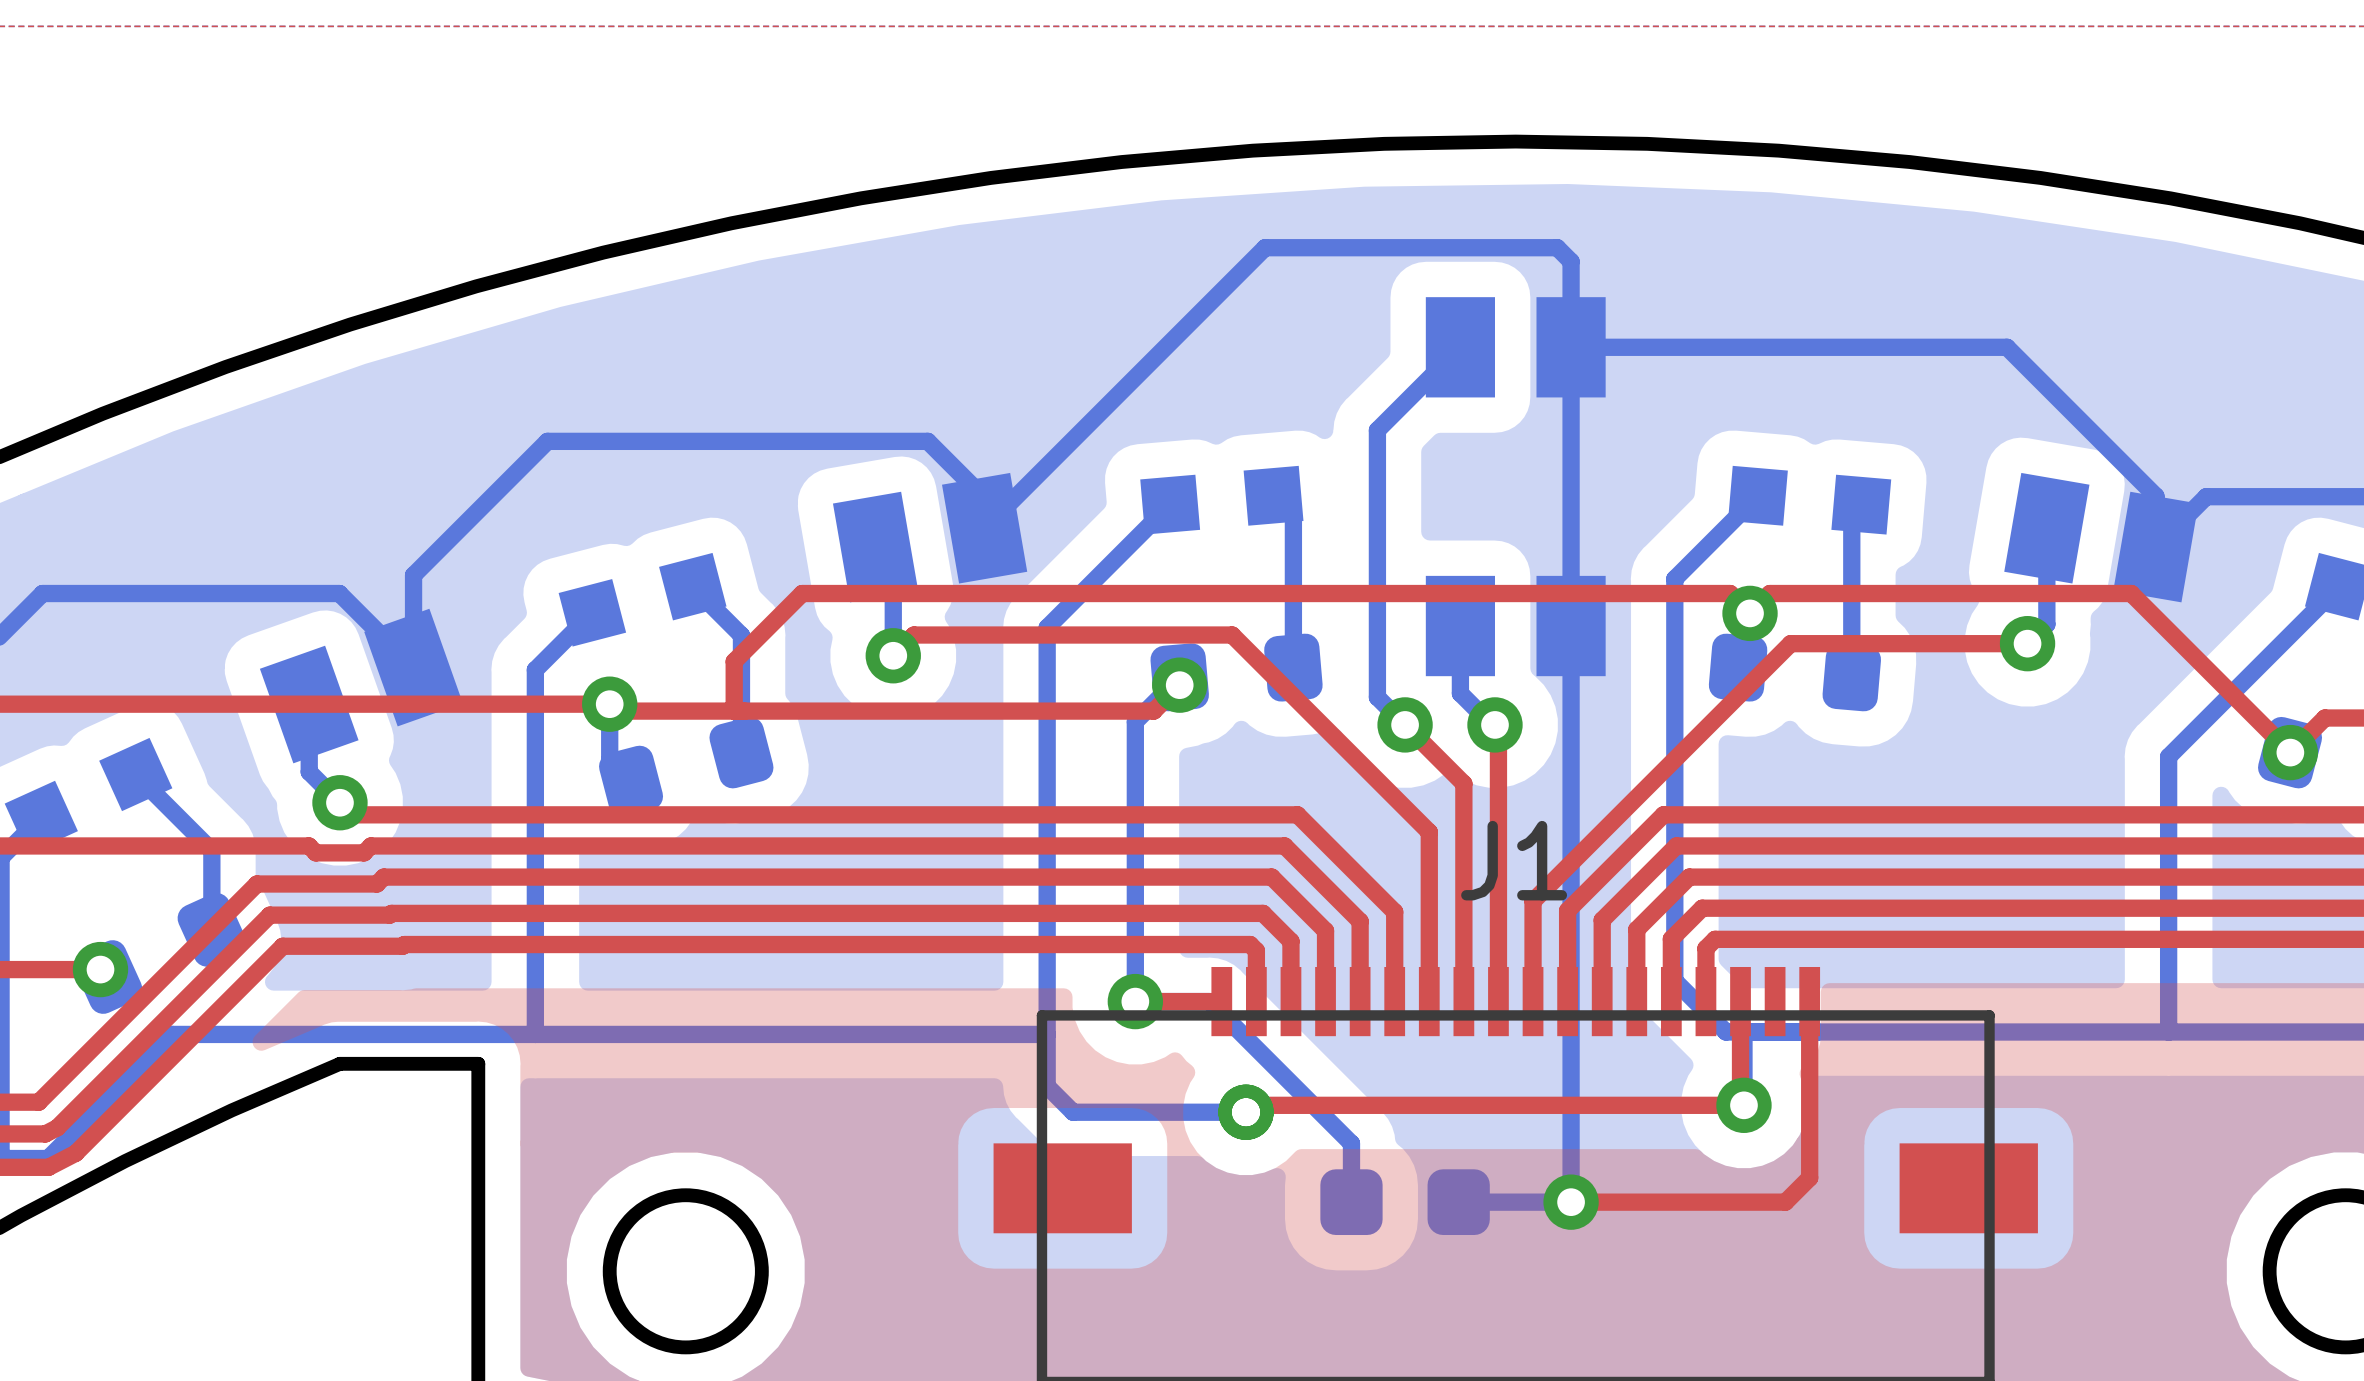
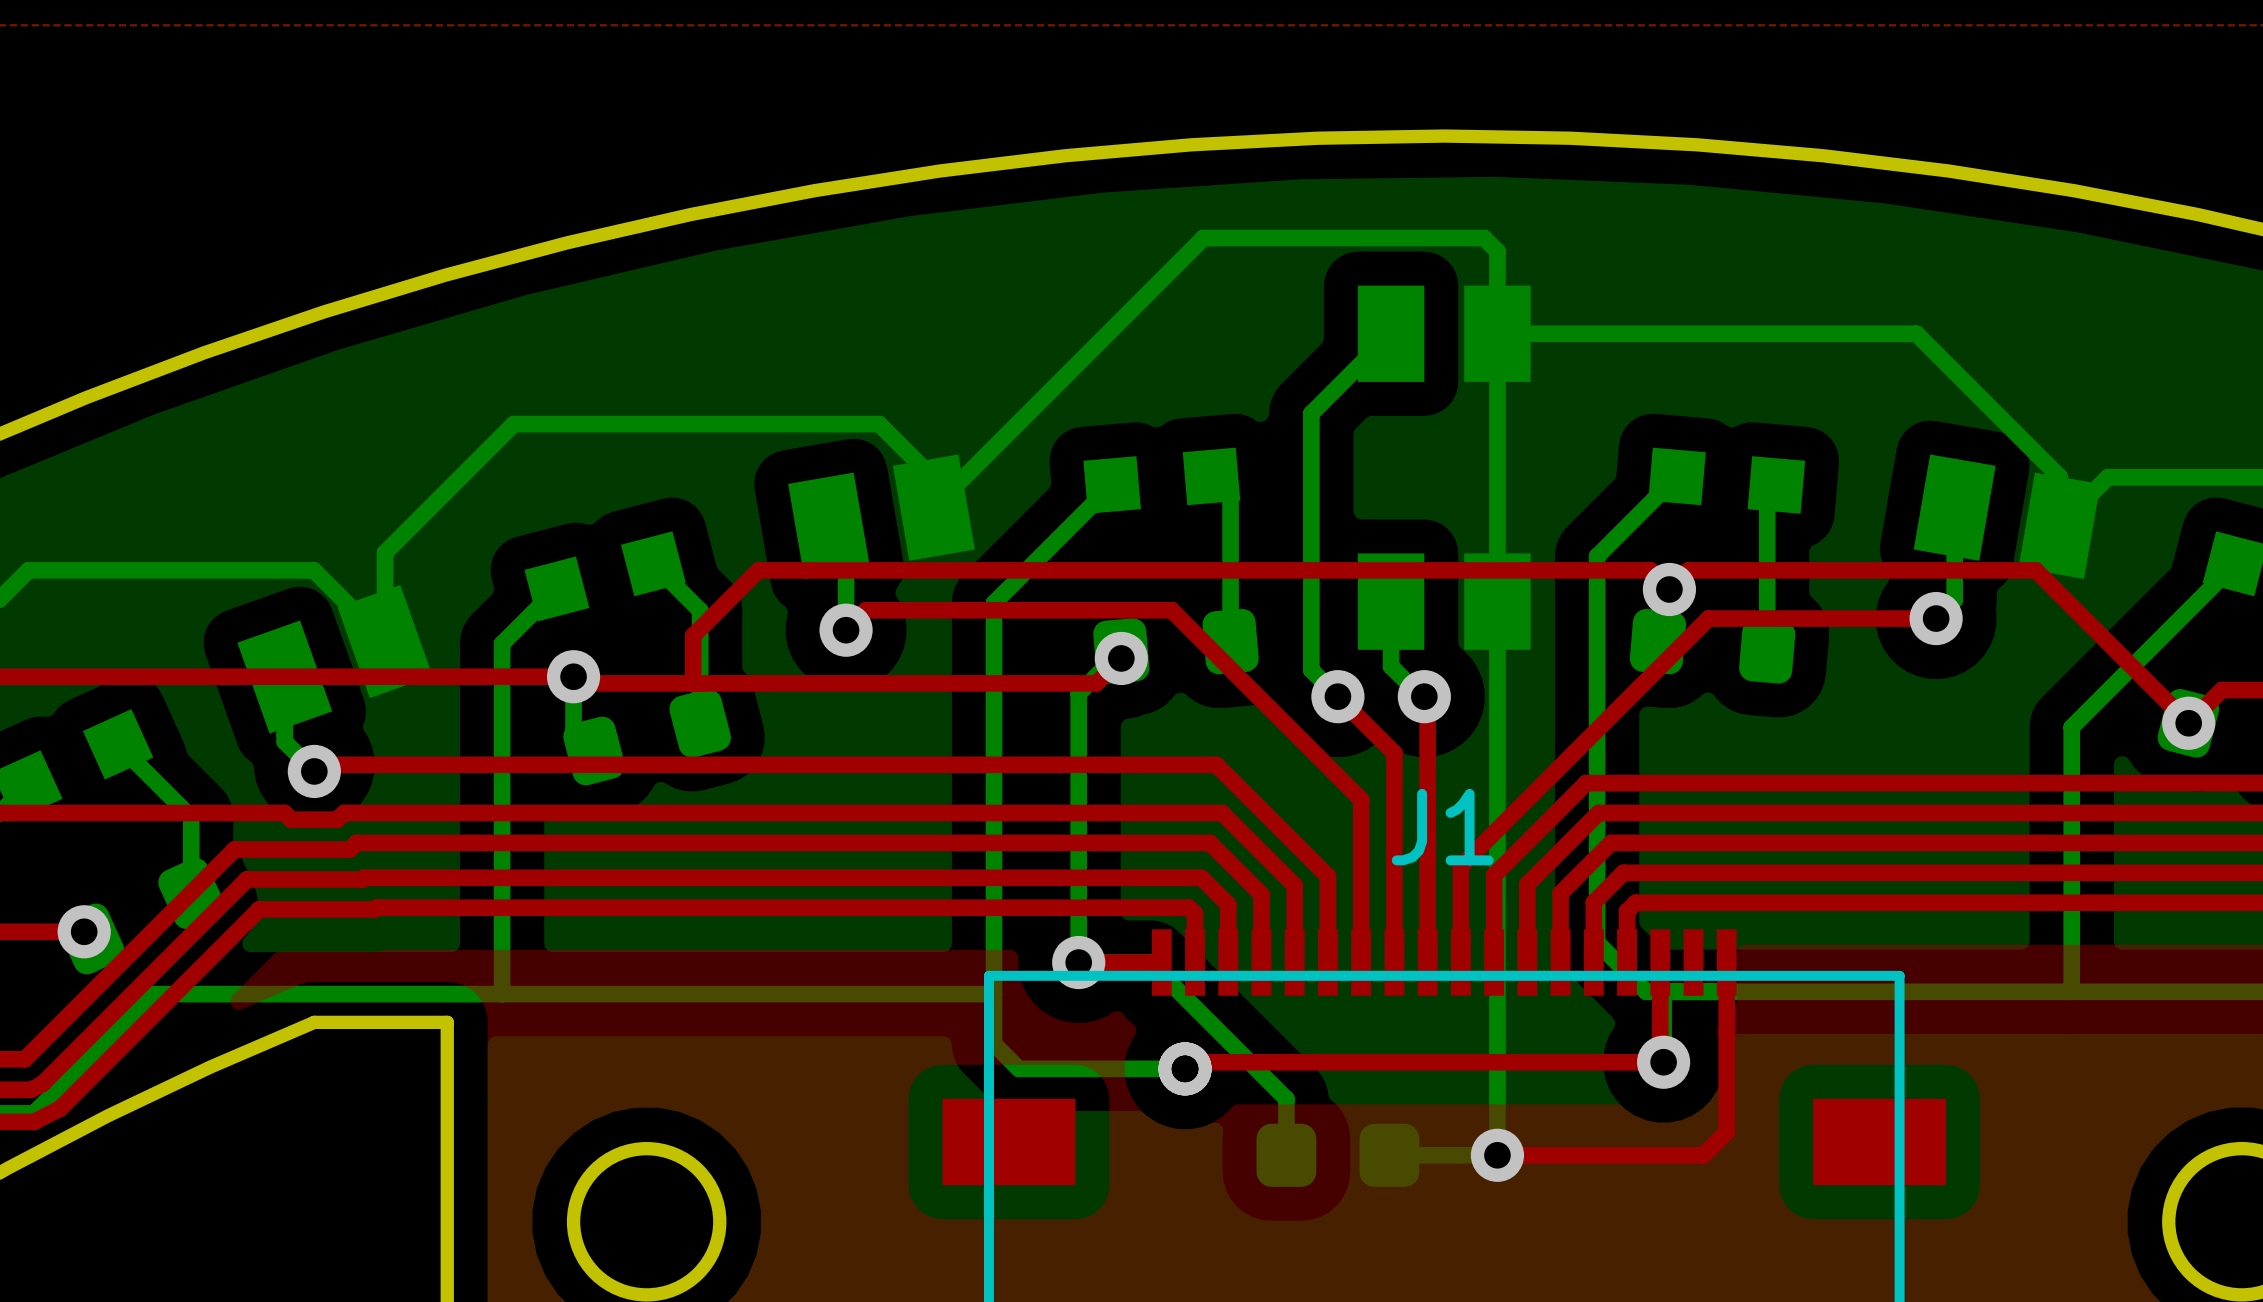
top track: (339, 802) (352, 814) (1297, 814) -> (314, 764) (1216, 764) (1234, 783)

